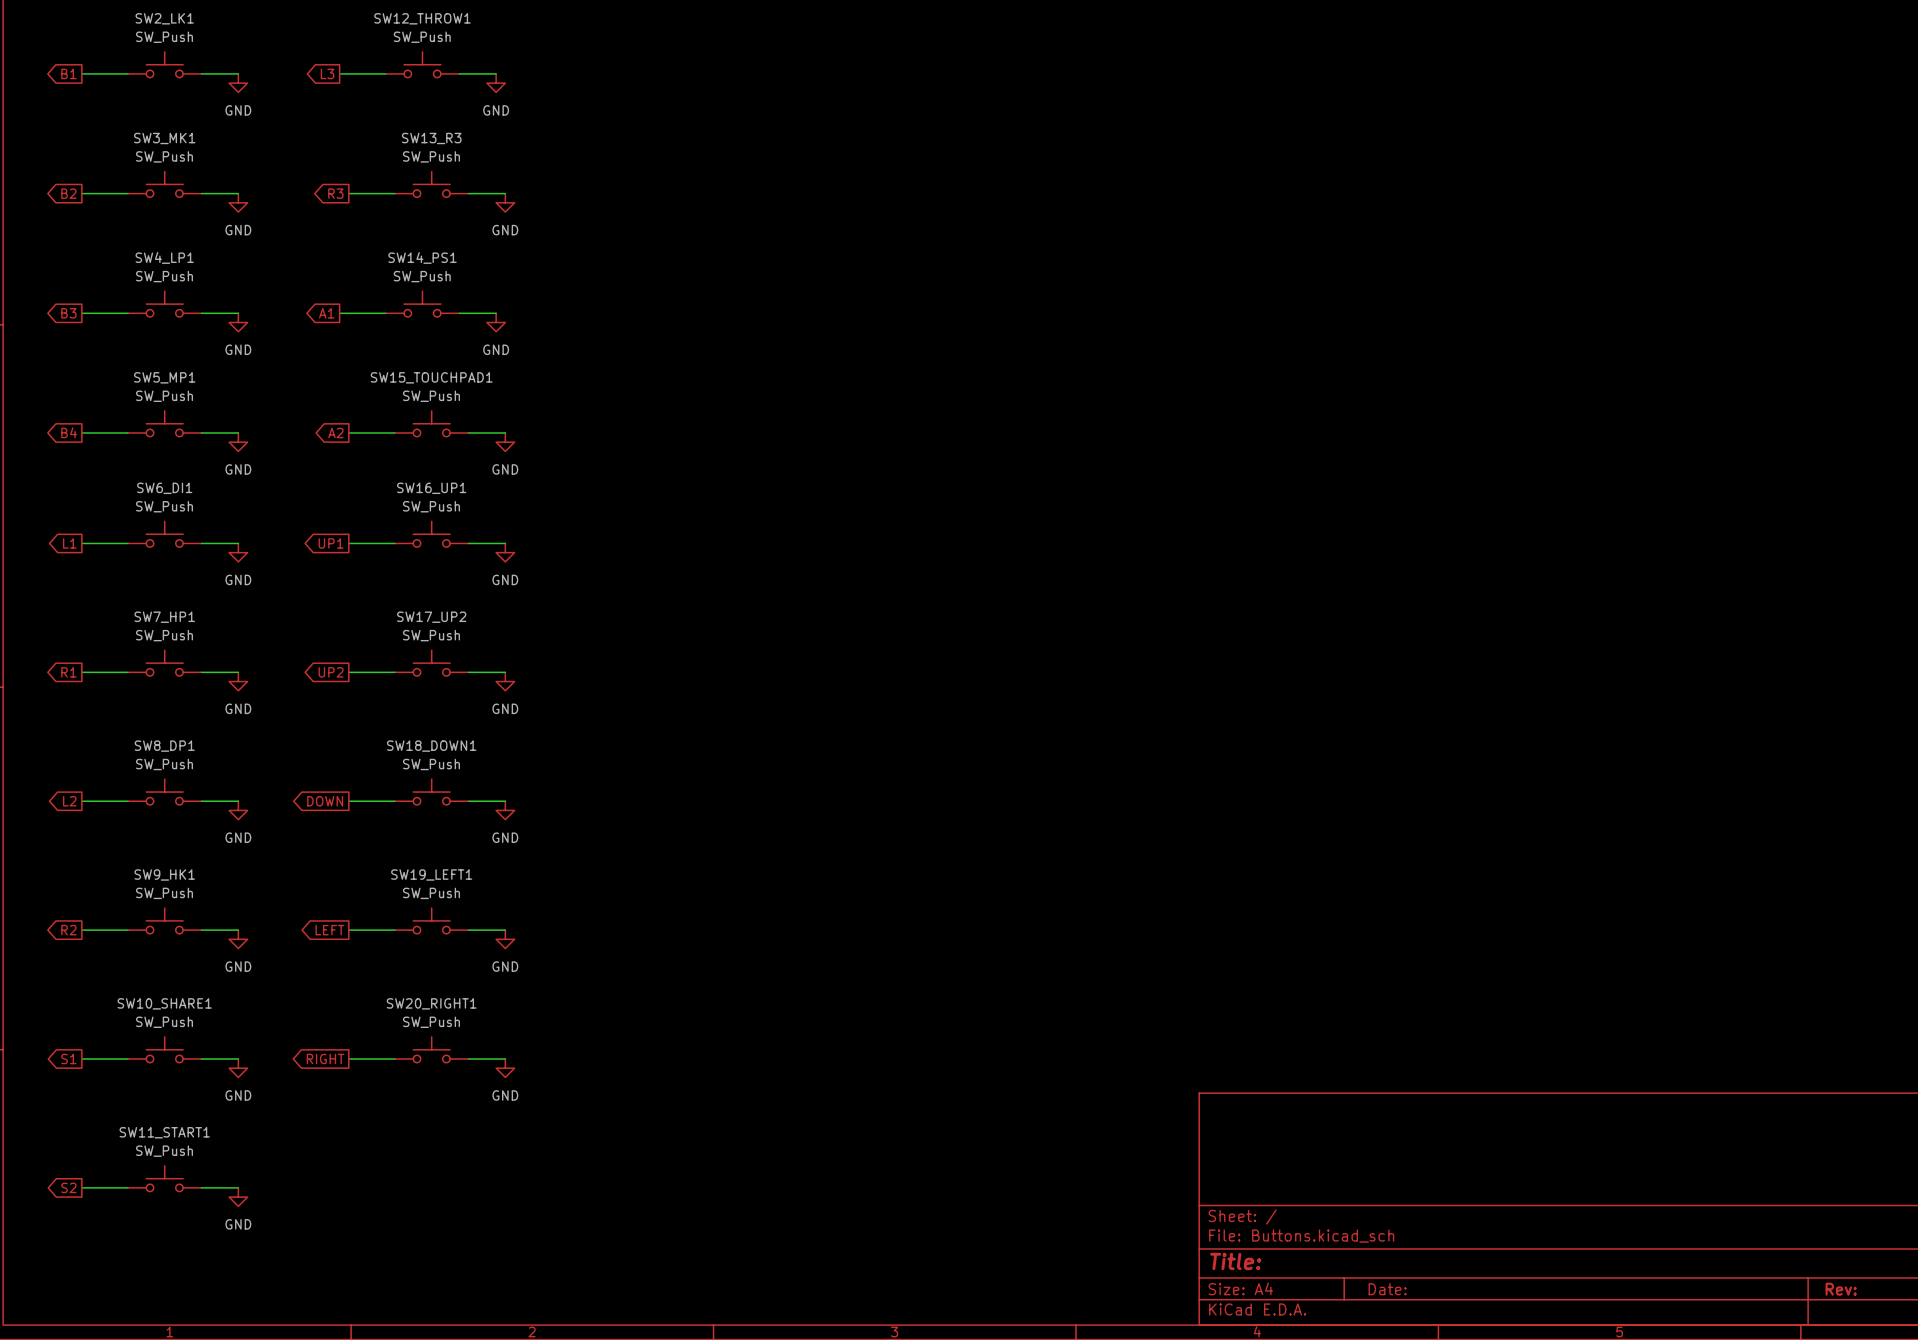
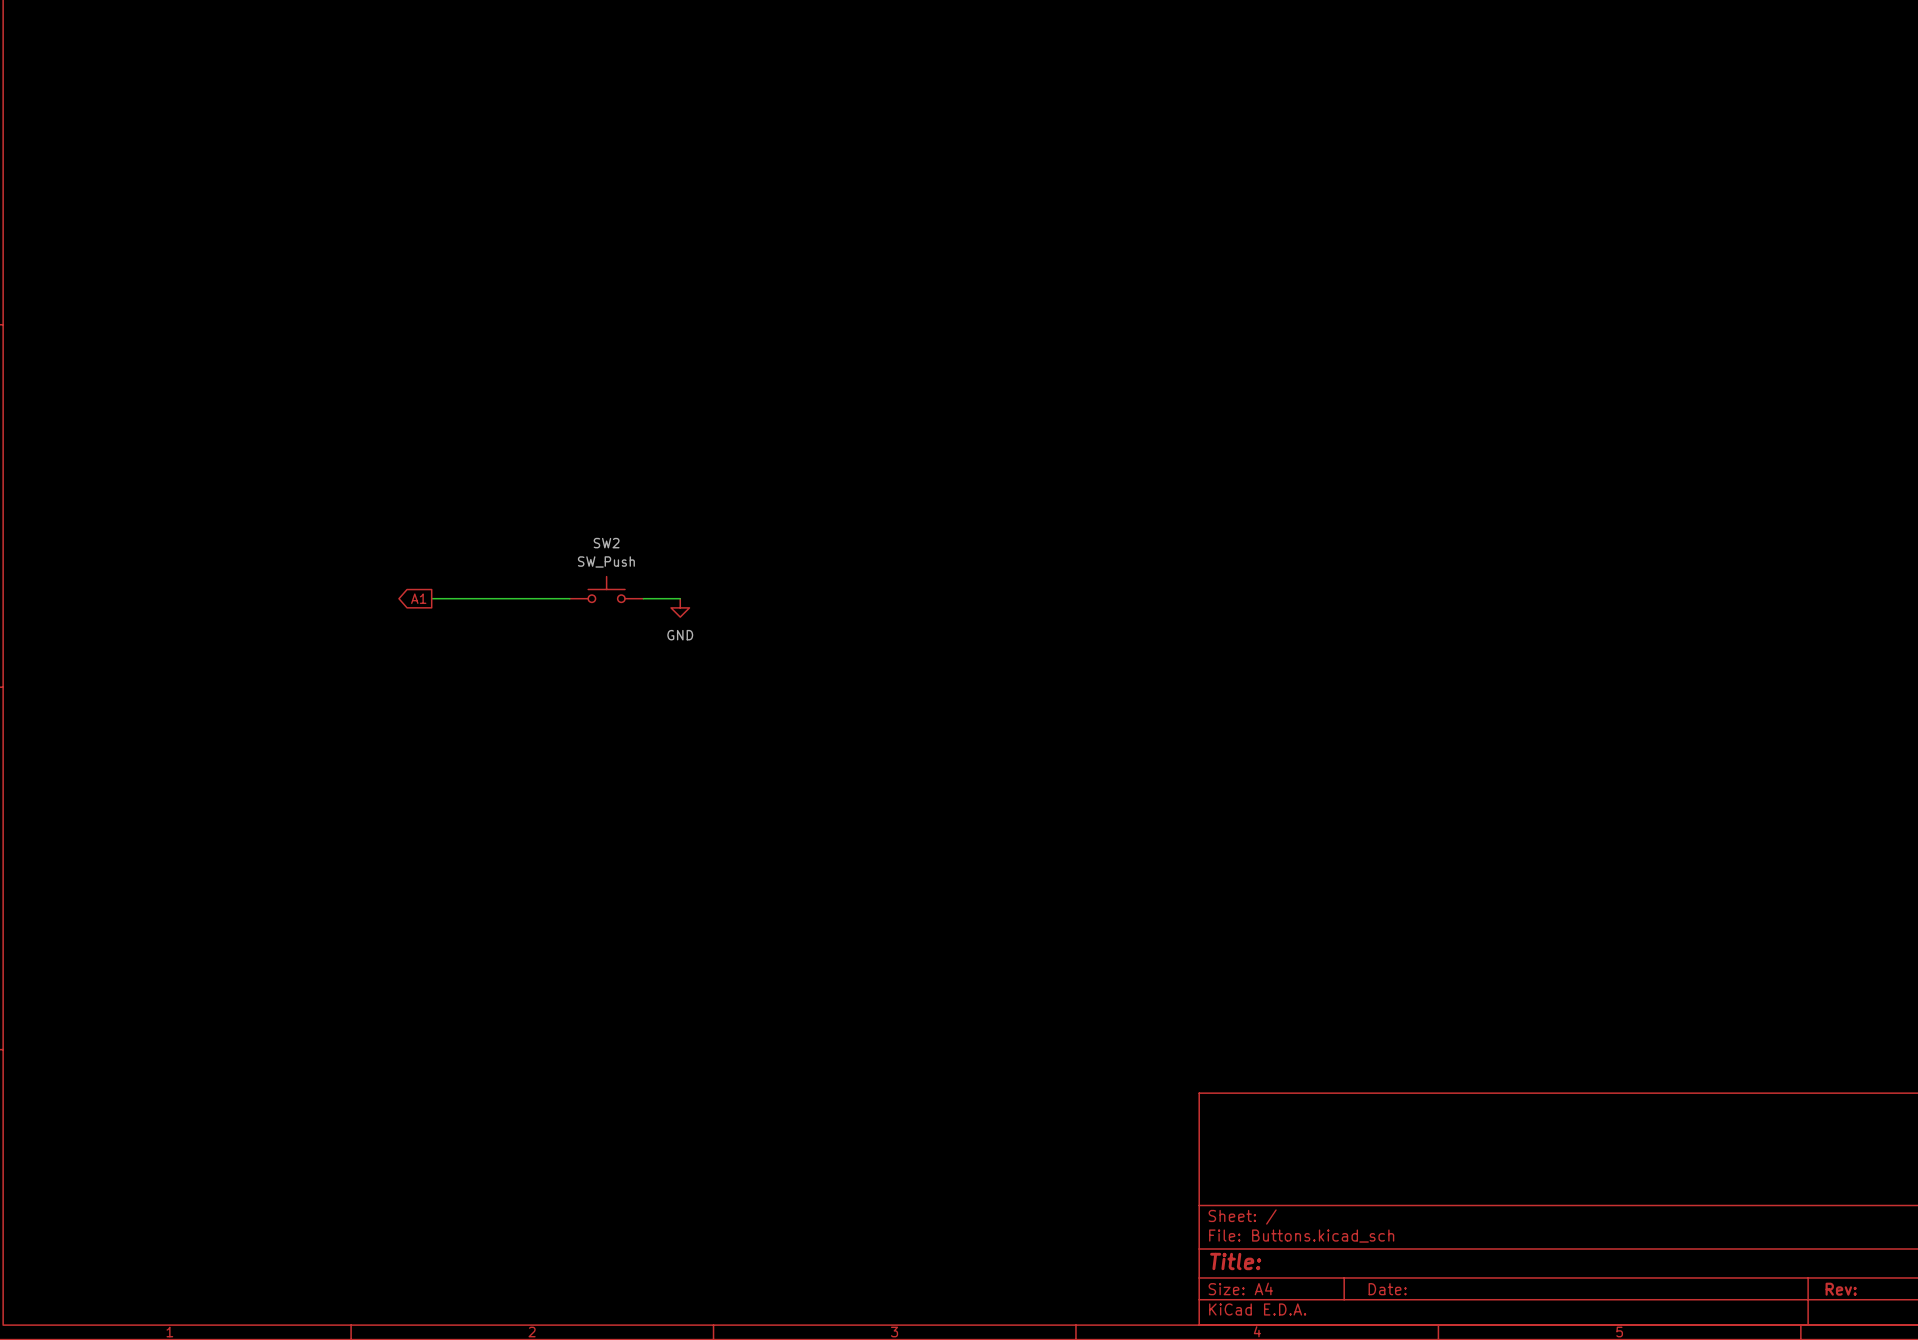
SW2_LK1: SW_Push (164, 64) -> none
SW12_THROW1: SW_Push (422, 64) -> none
global label: B1 (68, 73) -> none
wire: (81, 73) (127, 73) -> none
wire: (201, 73) (238, 73) -> none
global label: L3 (327, 73) -> none
wire: (339, 73) (385, 73) -> none
wire: (459, 73) (496, 73) -> none
power symbol: GND (238, 83) -> none
power symbol: GND (496, 83) -> none
SW3_MK1: SW_Push (164, 184) -> none
SW13_R3: SW_Push (431, 184) -> none
global label: B2 (68, 193) -> none
wire: (81, 193) (127, 193) -> none
wire: (201, 193) (238, 193) -> none
global label: R3 (335, 193) -> none
wire: (348, 193) (394, 193) -> none
wire: (468, 193) (505, 193) -> none
power symbol: GND (238, 202) -> none
power symbol: GND (505, 202) -> none
SW4_LP1: SW_Push (164, 304) -> none
SW14_PS1: SW_Push (422, 304) -> none
global label: B3 (68, 313) -> none
wire: (81, 313) (127, 313) -> none
wire: (201, 313) (238, 313) -> none
global label: A1 (326, 313) -> none
wire: (339, 313) (385, 313) -> none
wire: (459, 313) (496, 313) -> none
power symbol: GND (238, 322) -> none
power symbol: GND (496, 322) -> none
SW5_MP1: SW_Push (164, 423) -> none
SW15_TOUCHPAD1: SW_Push (431, 423) -> none
global label: B4 (69, 432) -> none
wire: (81, 432) (127, 432) -> none
wire: (201, 432) (238, 432) -> none
global label: A2 (335, 432) -> none
wire: (348, 432) (394, 432) -> none
wire: (468, 432) (505, 432) -> none
power symbol: GND (238, 442) -> none
power symbol: GND (505, 442) -> none
SW6_DI1: SW_Push (164, 534) -> none
SW16_UP1: SW_Push (431, 534) -> none
global label: L1 (69, 543) -> none
wire: (81, 543) (127, 543) -> none
wire: (201, 543) (238, 543) -> none
global label: UP1 (331, 543) -> none
wire: (348, 543) (394, 543) -> none
wire: (468, 543) (505, 543) -> none
power symbol: GND (238, 552) -> none
power symbol: GND (505, 552) -> none
SW2: none -> SW_Push (606, 589)
global label: none -> A1 (418, 598)
wire: none -> (431, 598) (569, 598)
wire: none -> (643, 598) (680, 598)
power symbol: none -> GND (680, 607)
SW7_HP1: SW_Push (164, 663) -> none
SW17_UP2: SW_Push (431, 663) -> none
global label: R1 (68, 672) -> none
wire: (81, 672) (127, 672) -> none
wire: (201, 672) (238, 672) -> none
global label: UP2 (331, 672) -> none
wire: (348, 672) (394, 672) -> none
wire: (468, 672) (505, 672) -> none
power symbol: GND (238, 681) -> none
power symbol: GND (505, 681) -> none
SW8_DP1: SW_Push (164, 792) -> none
SW18_DOWN1: SW_Push (431, 792) -> none
global label: L2 (69, 801) -> none
wire: (81, 801) (127, 801) -> none
wire: (201, 801) (238, 801) -> none
global label: DOWN (325, 801) -> none
wire: (348, 801) (394, 801) -> none
wire: (468, 801) (505, 801) -> none
power symbol: GND (238, 810) -> none
power symbol: GND (505, 810) -> none
SW9_HK1: SW_Push (164, 920) -> none
SW19_LEFT1: SW_Push (431, 920) -> none
global label: R2 (68, 930) -> none
wire: (81, 930) (127, 930) -> none
wire: (201, 930) (238, 930) -> none
global label: LEFT (329, 930) -> none
wire: (348, 930) (394, 930) -> none
wire: (468, 930) (505, 930) -> none
power symbol: GND (238, 939) -> none
power symbol: GND (505, 939) -> none
SW10_SHARE1: SW_Push (164, 1049) -> none
SW20_RIGHT1: SW_Push (431, 1049) -> none
global label: S1 (68, 1059) -> none
wire: (81, 1059) (127, 1059) -> none
wire: (201, 1059) (238, 1059) -> none
global label: RIGHT (325, 1059) -> none
wire: (348, 1059) (394, 1059) -> none
wire: (468, 1059) (505, 1059) -> none
power symbol: GND (238, 1068) -> none
power symbol: GND (505, 1068) -> none
SW11_START1: SW_Push (164, 1178) -> none
global label: S2 (68, 1187) -> none
wire: (81, 1187) (127, 1187) -> none
wire: (201, 1187) (238, 1187) -> none
power symbol: GND (238, 1197) -> none

